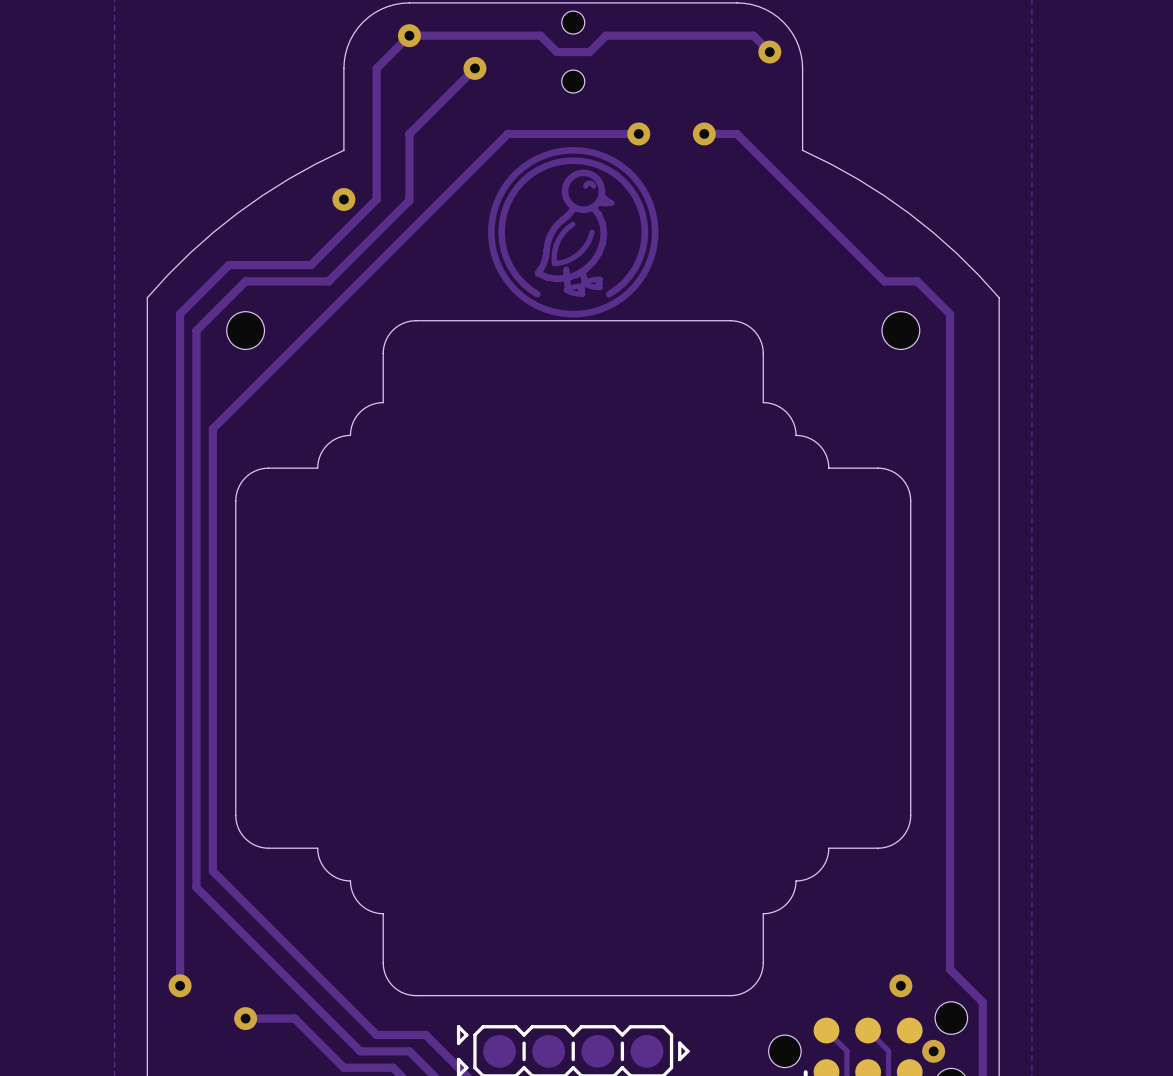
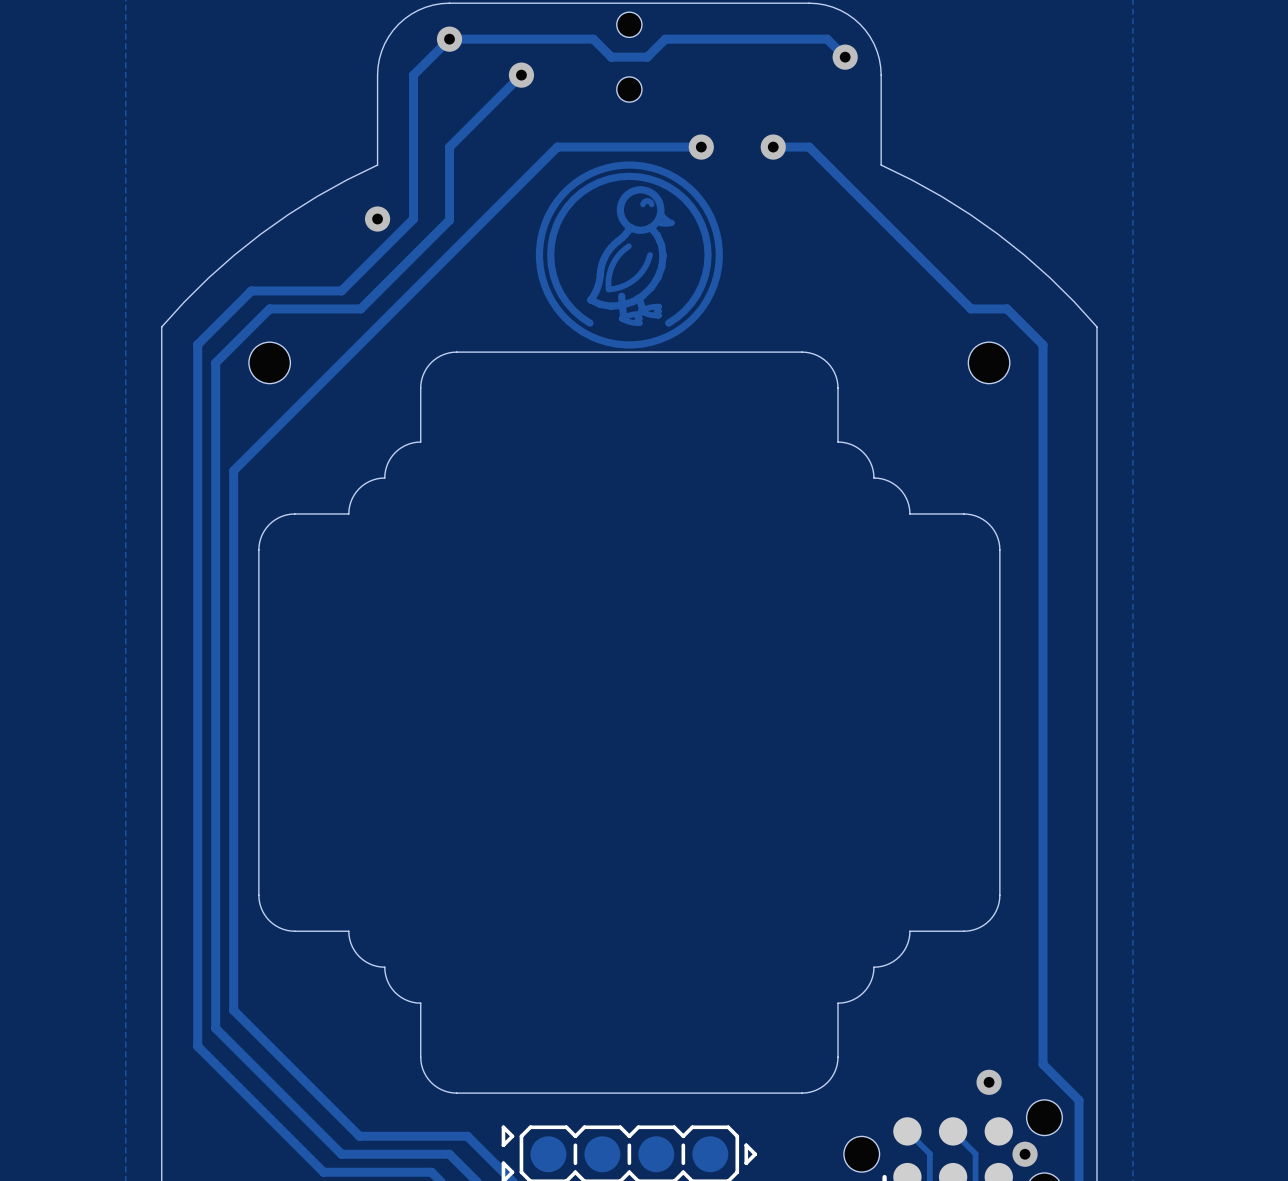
track: (212, 871) (376, 1034) -> (233, 956) (233, 1010) (359, 1136) (413, 1136)
track: (196, 887) (360, 1051) -> (215, 974) (215, 1028) (341, 1154) (395, 1154)
track: (180, 953) (180, 985) -> none
via: (180, 985) -> none
track: (245, 1018) (294, 1018) (343, 1067) -> (197, 1046) (323, 1172) (377, 1172)
via: (245, 1018) -> none

